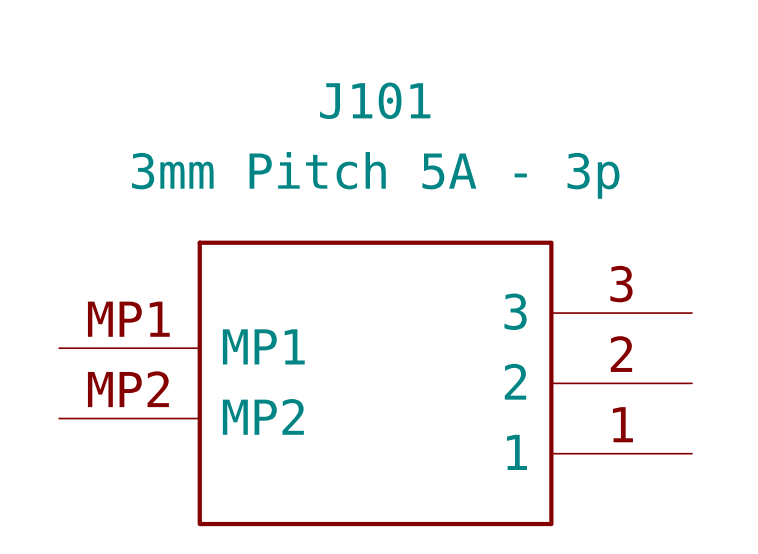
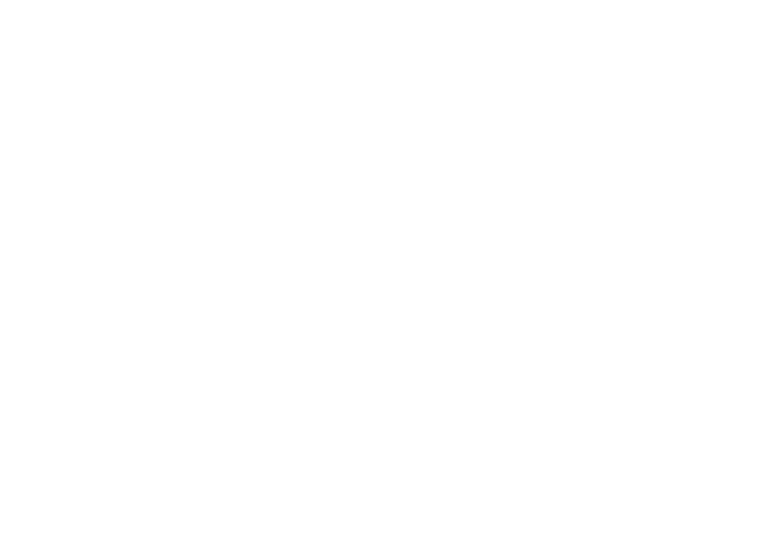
J101: 3mm Pitch 5A - 3p (375, 383) -> none

